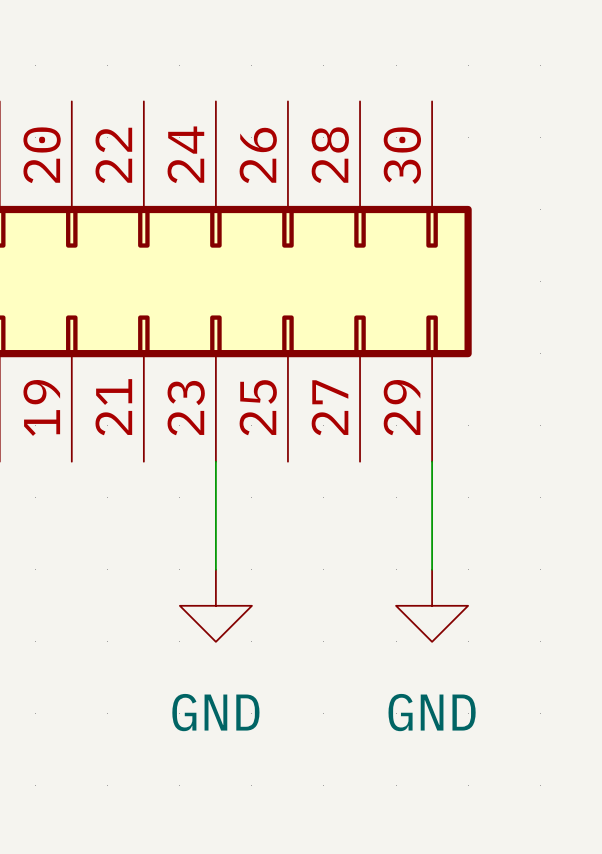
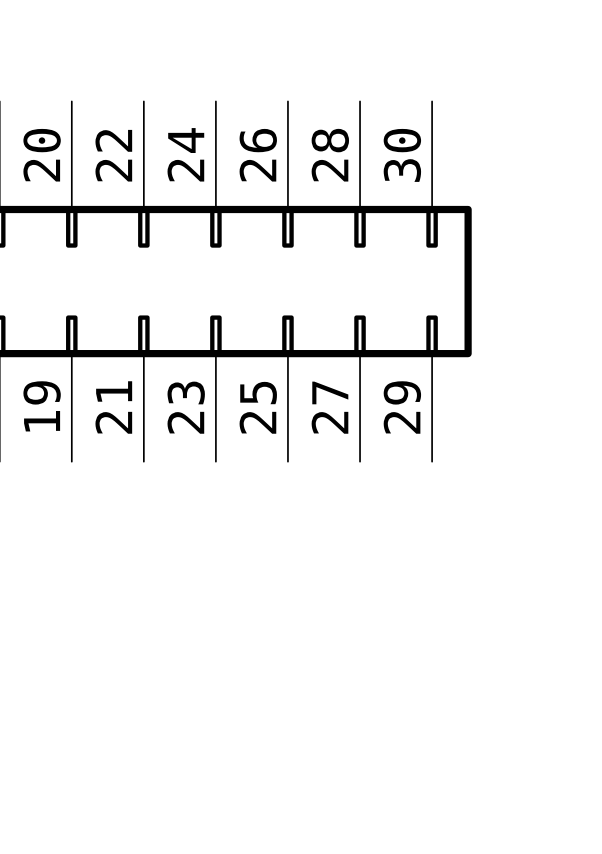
wire: (215, 461) (215, 569) -> none
wire: (432, 461) (432, 569) -> none
power symbol: GND (215, 605) -> none
power symbol: GND (432, 605) -> none

